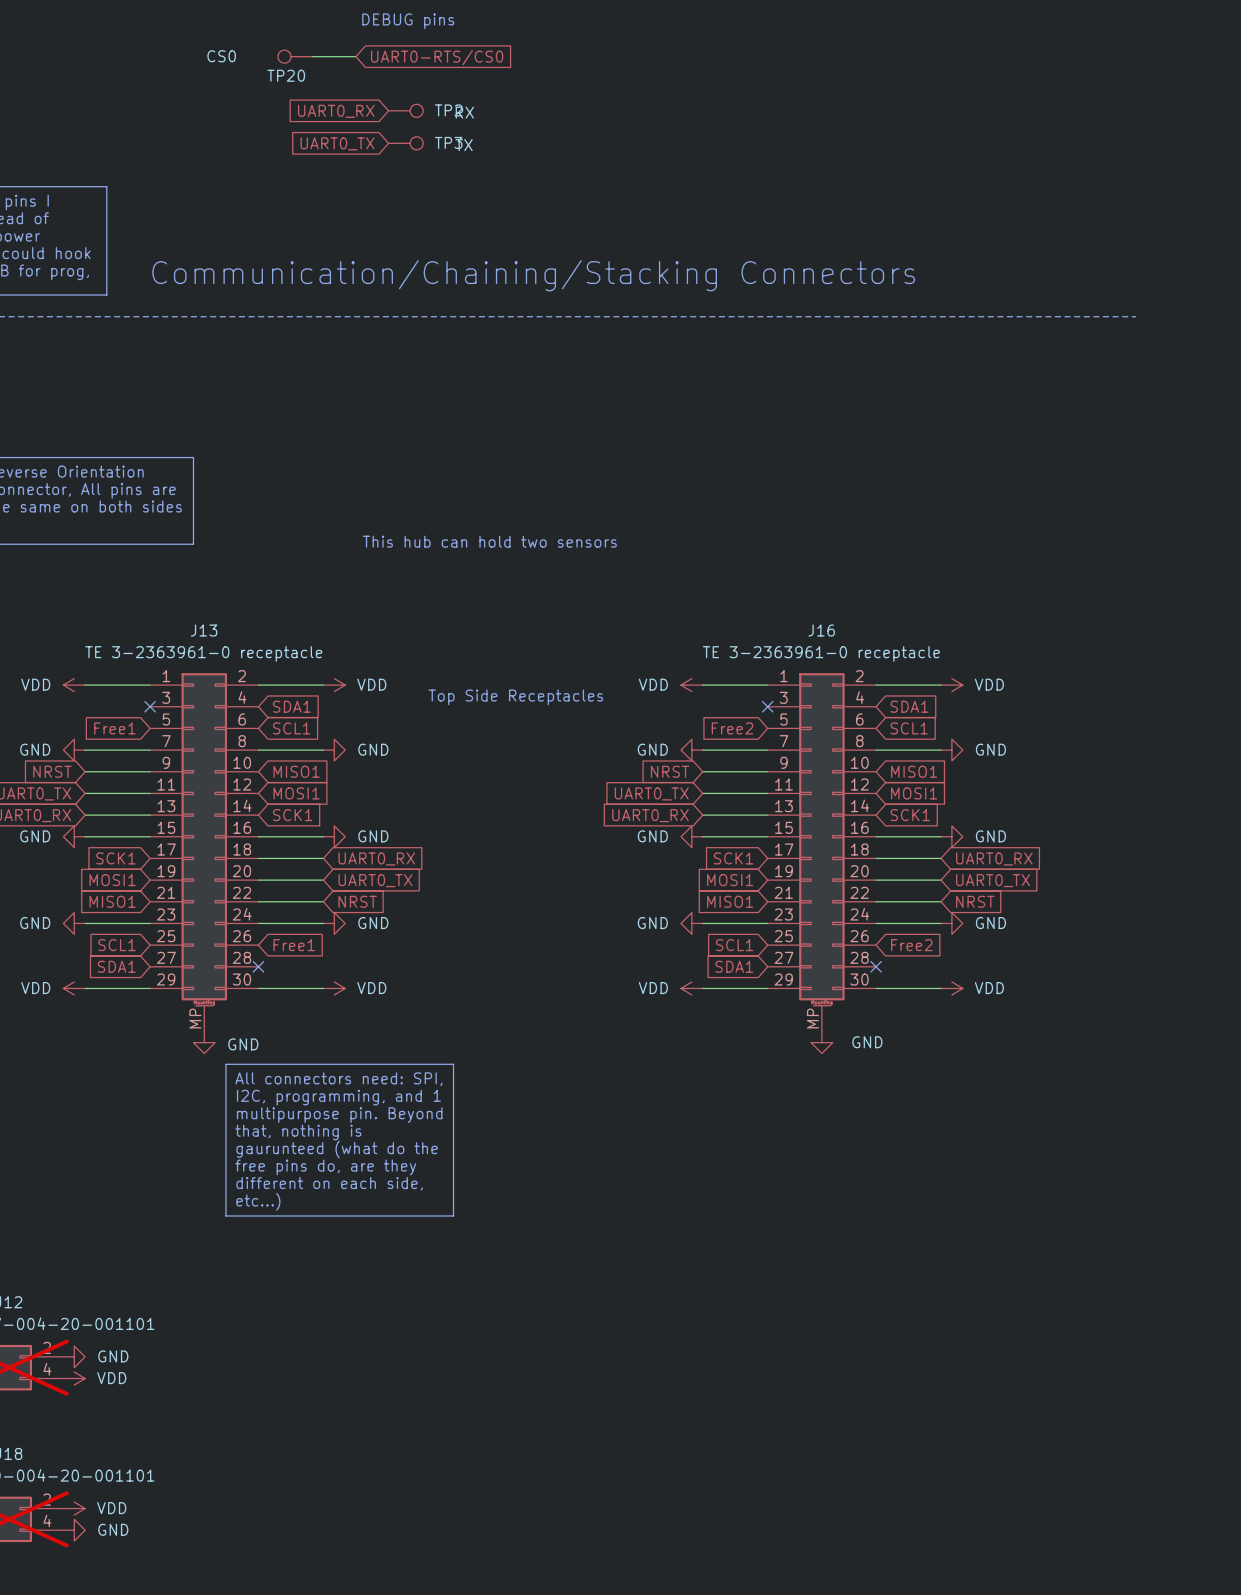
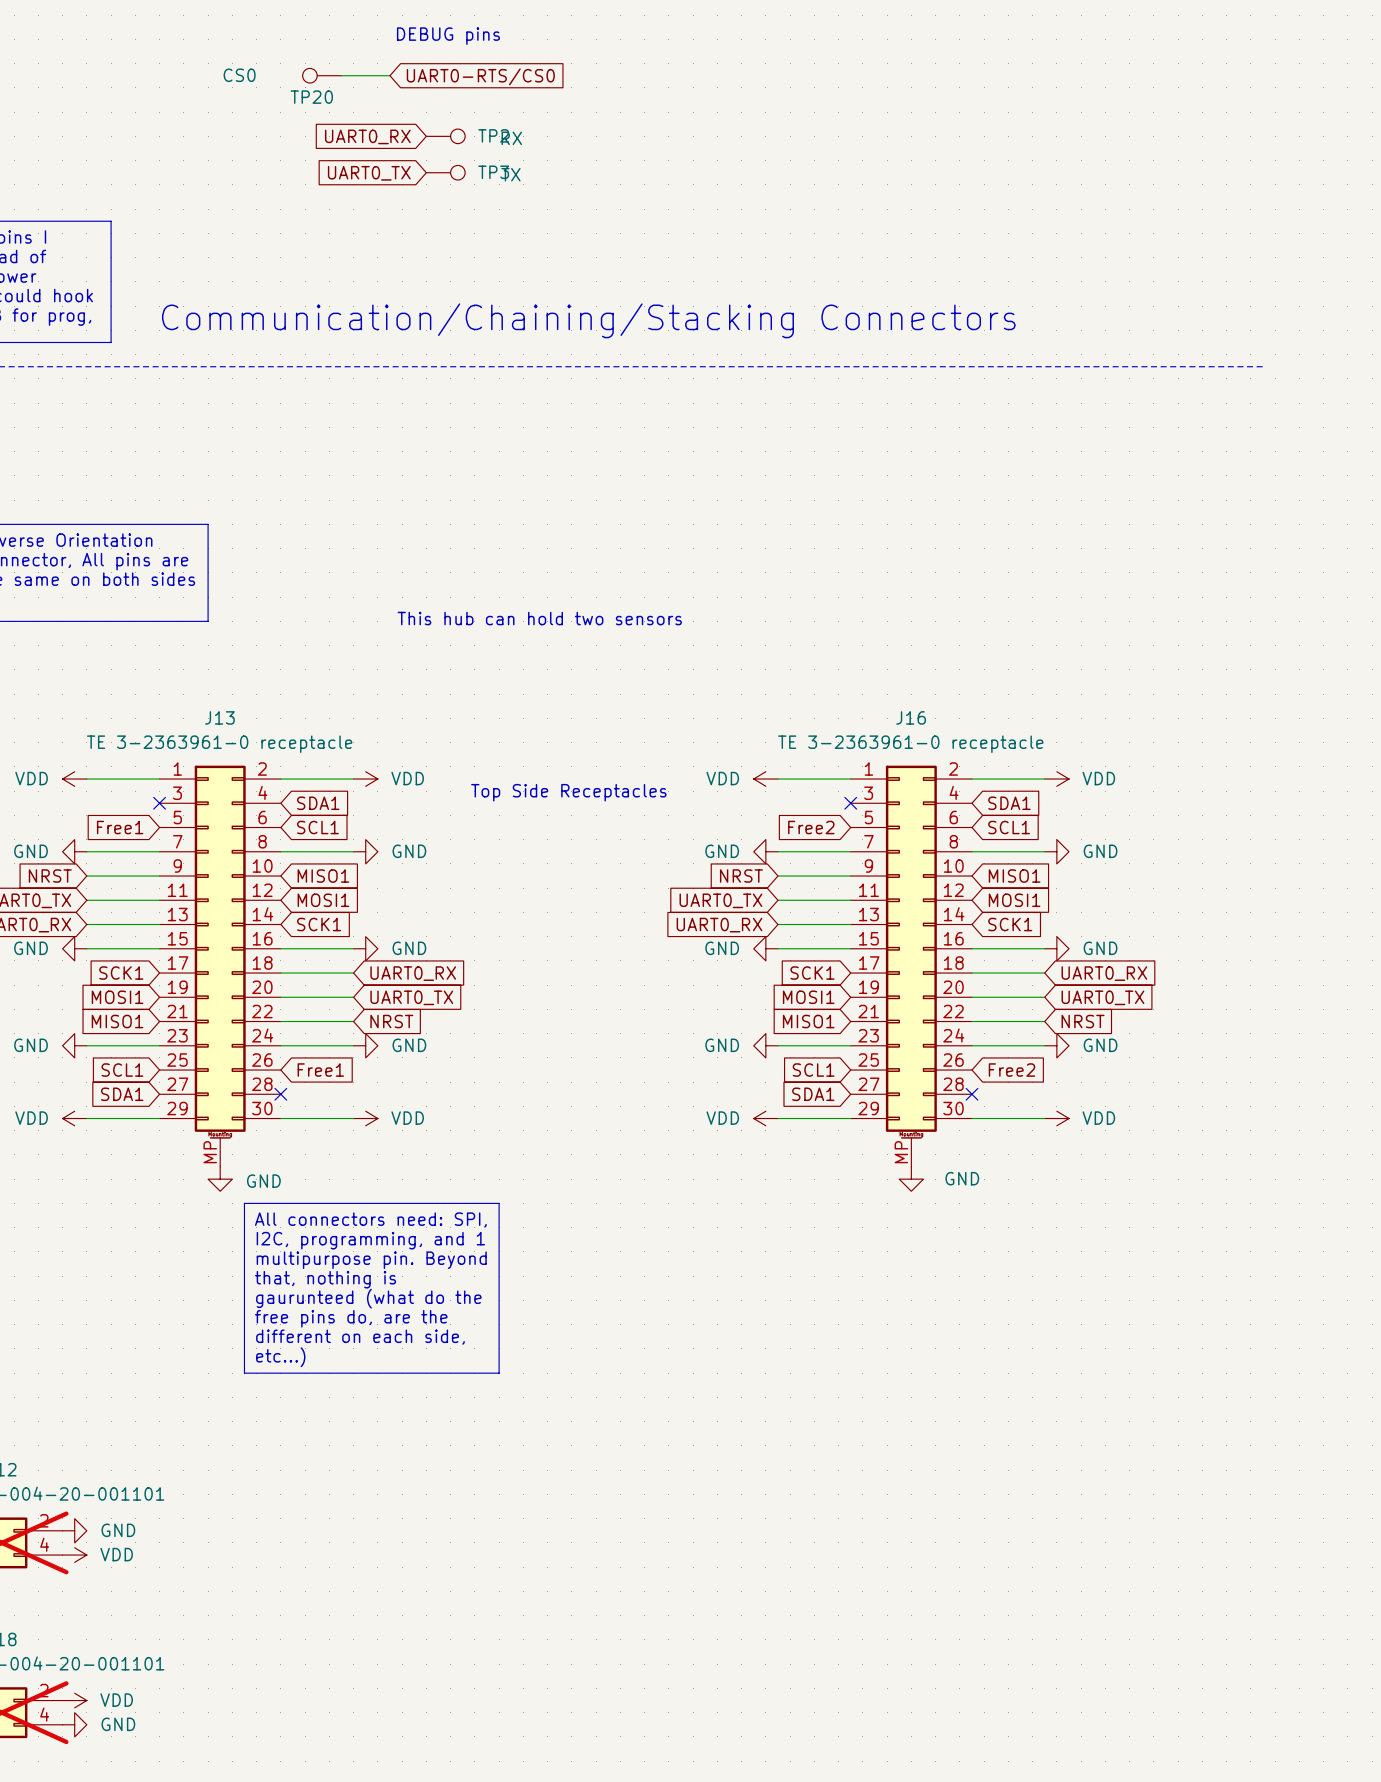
text: free pins do, are they (325, 1167) -> free pins do, are the (351, 1318)

